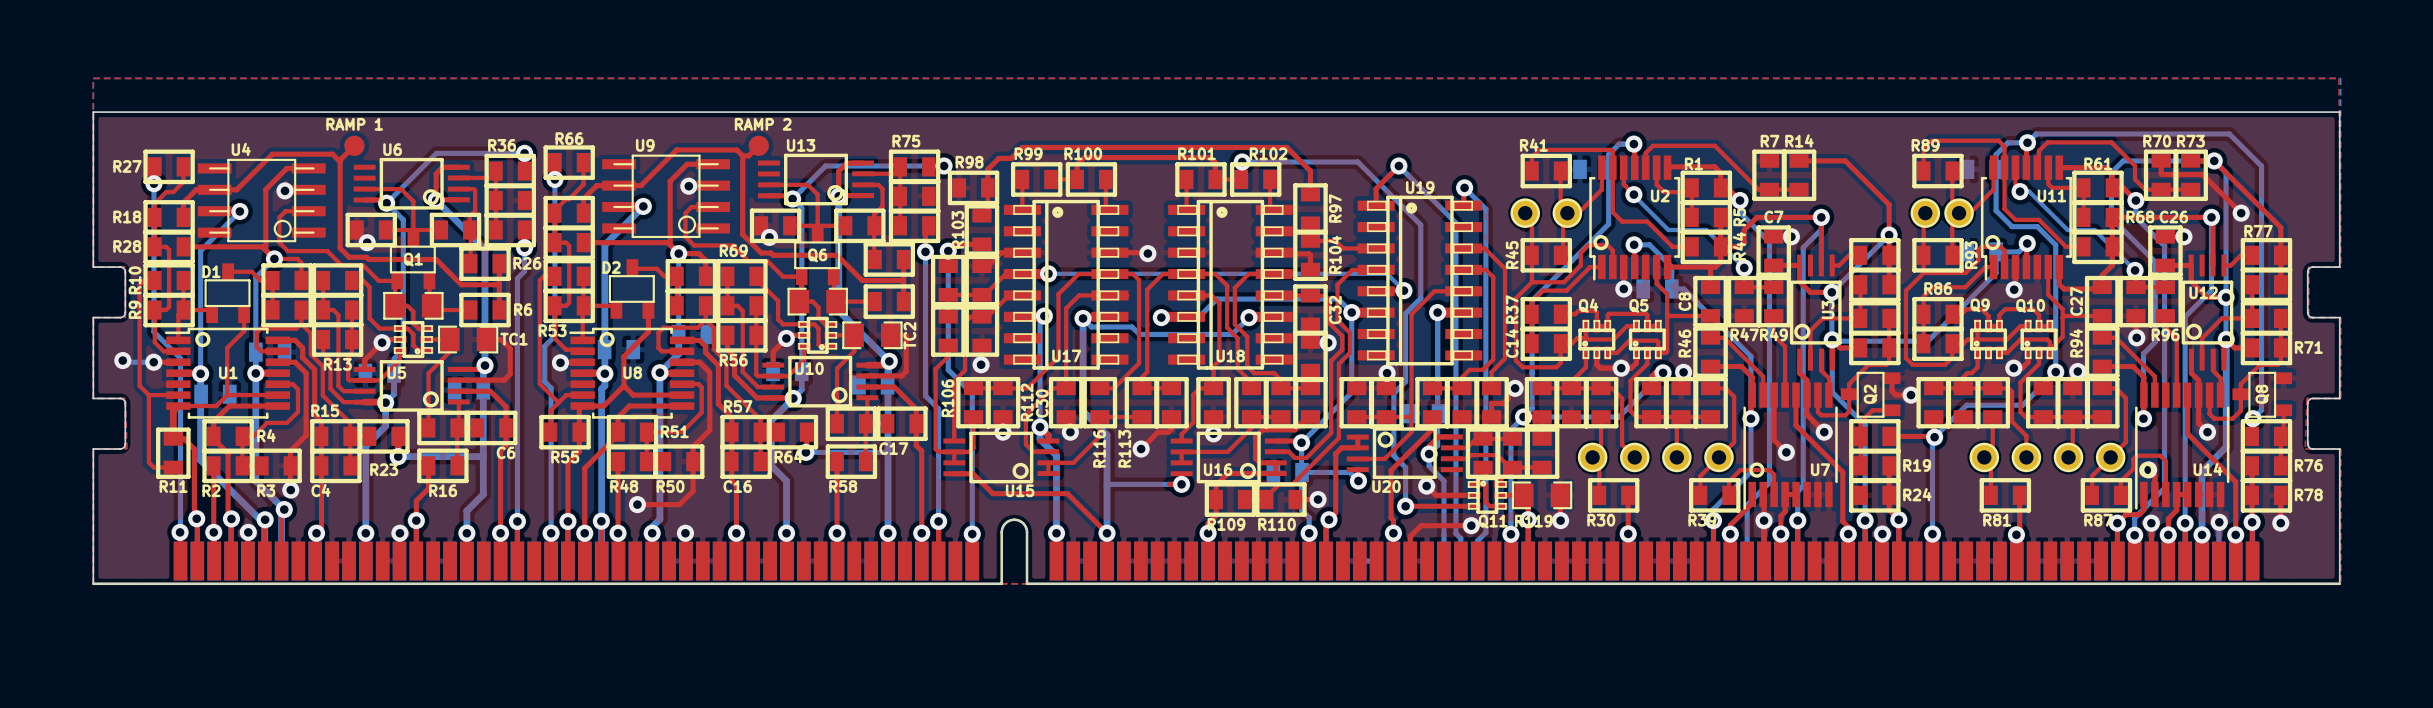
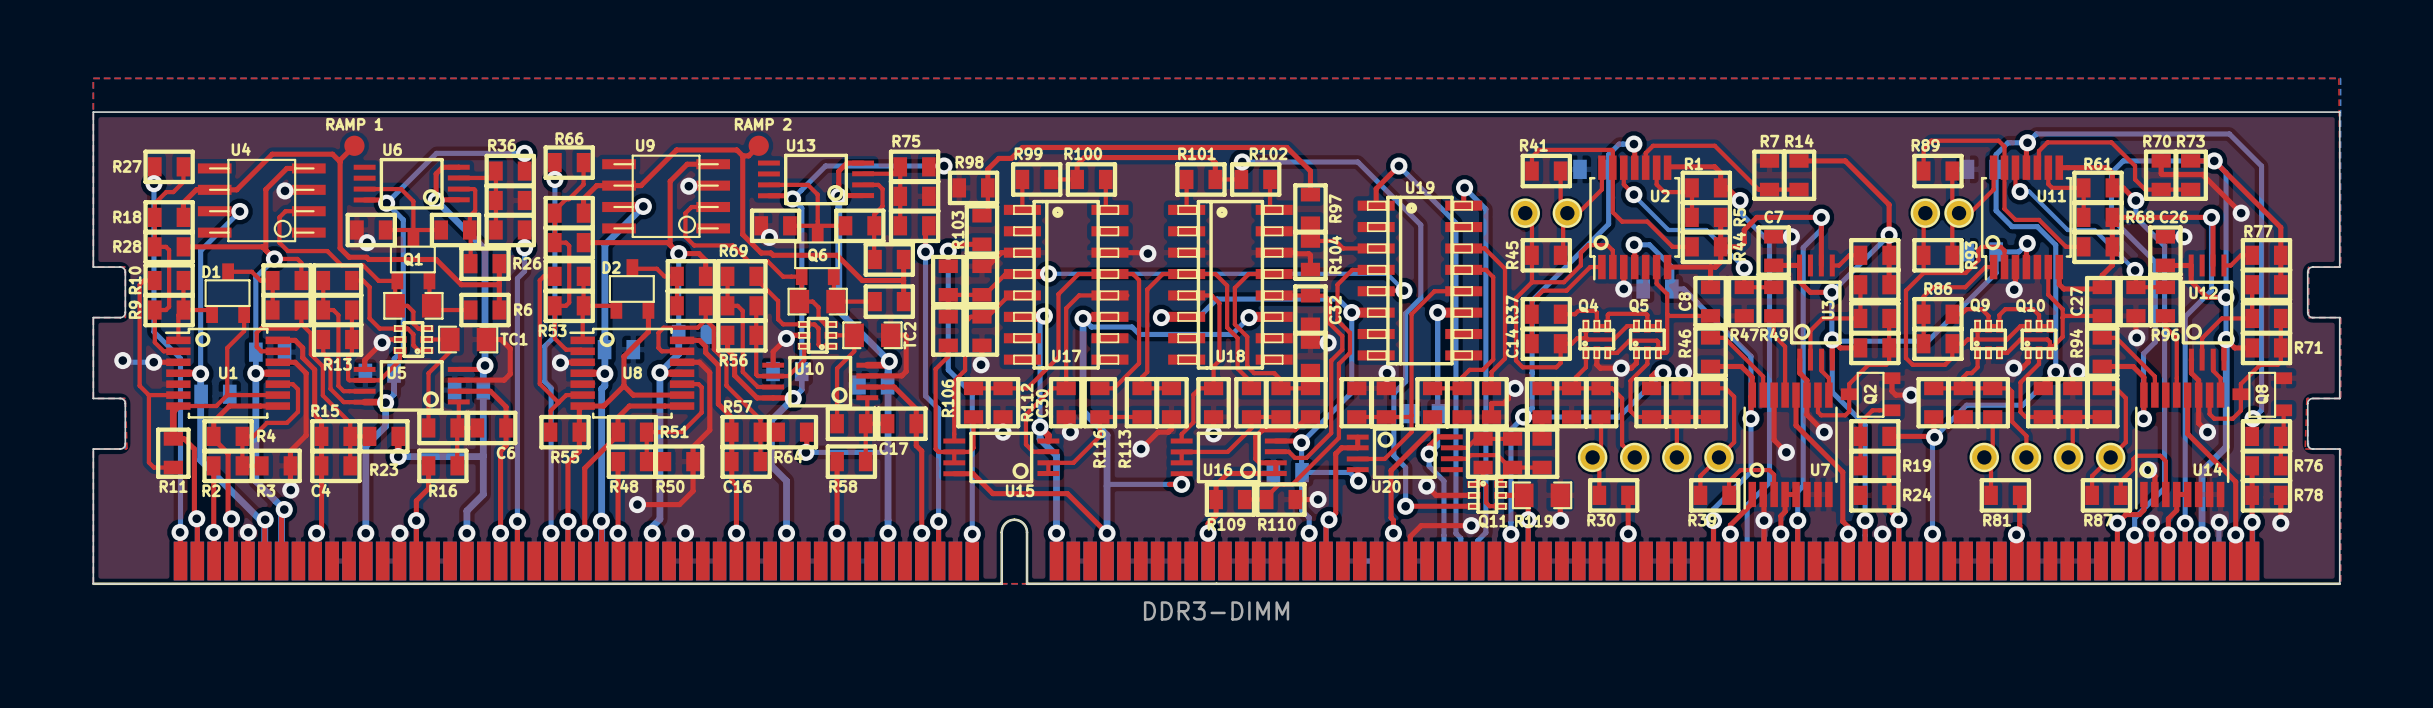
part value: none -> DDR3-DIMM (1216, 610)

